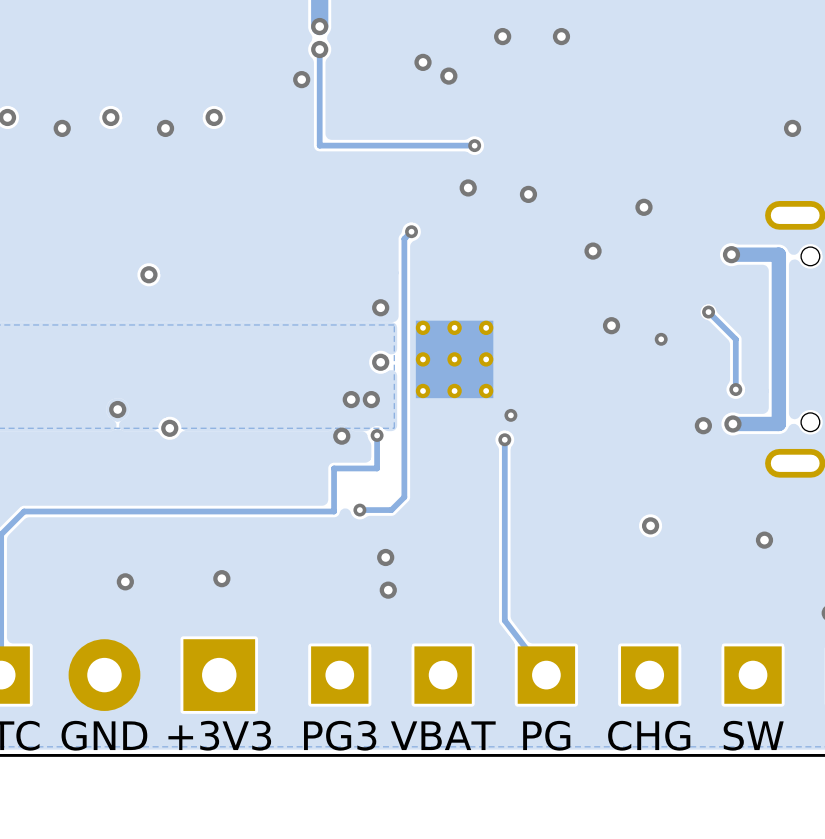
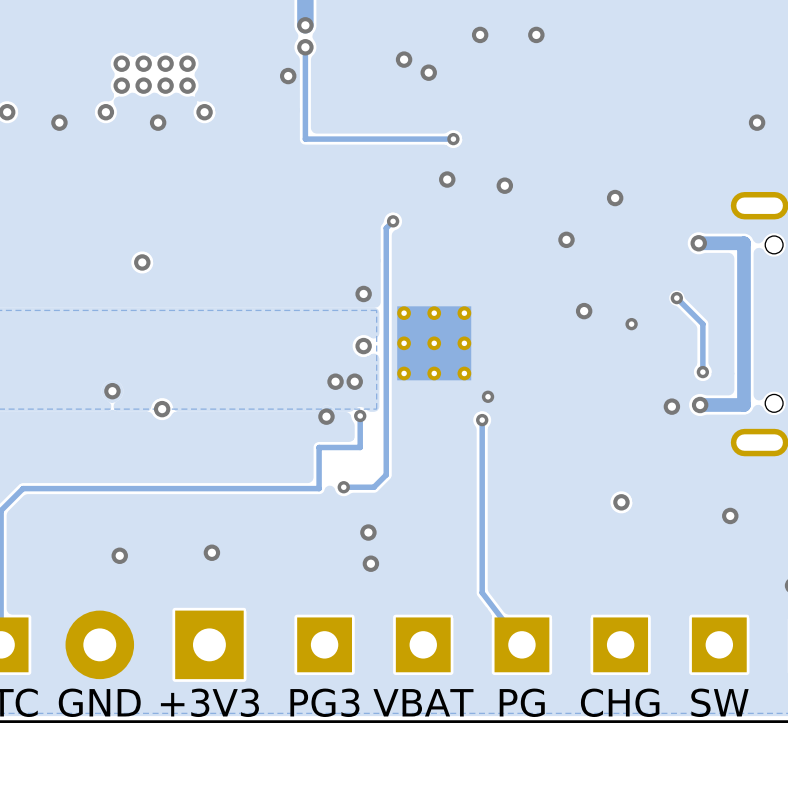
via: none -> (121, 63)
via: none -> (143, 63)
via: none -> (165, 63)
via: none -> (187, 63)
via: none -> (121, 85)
via: none -> (143, 85)
via: none -> (165, 85)
via: none -> (187, 85)

